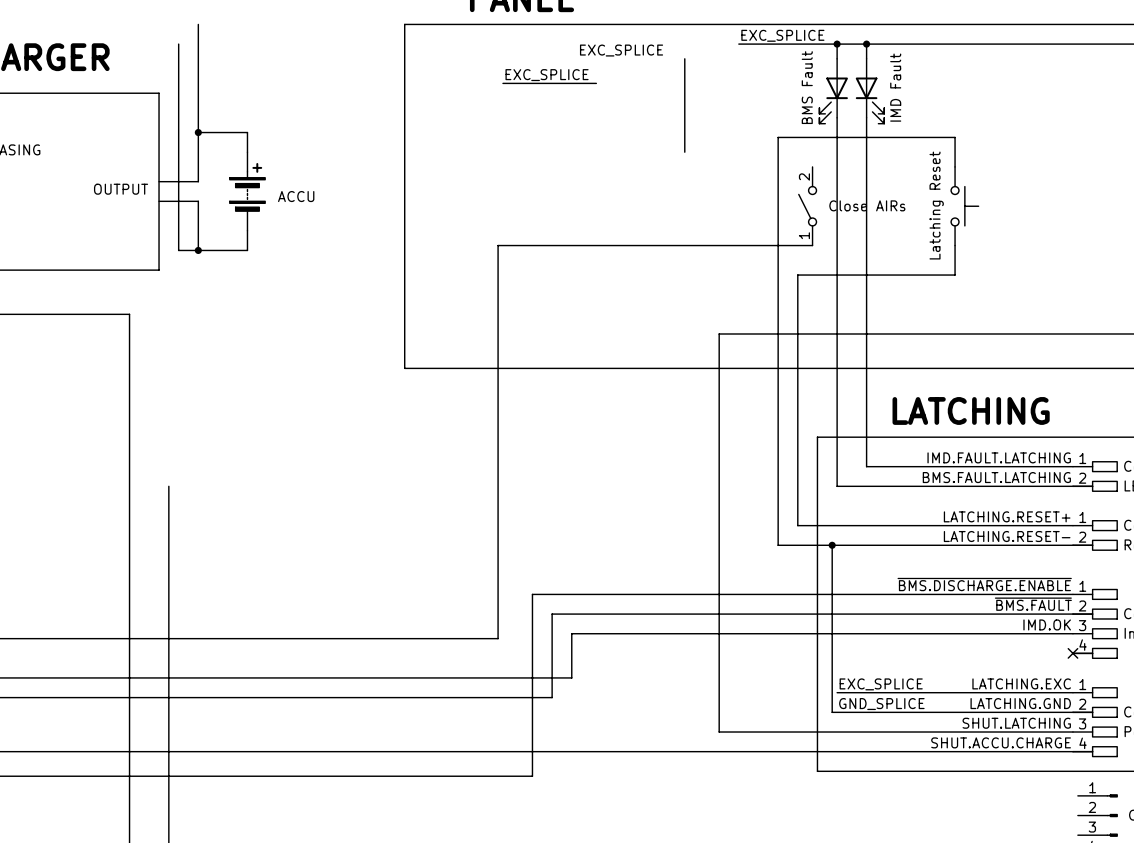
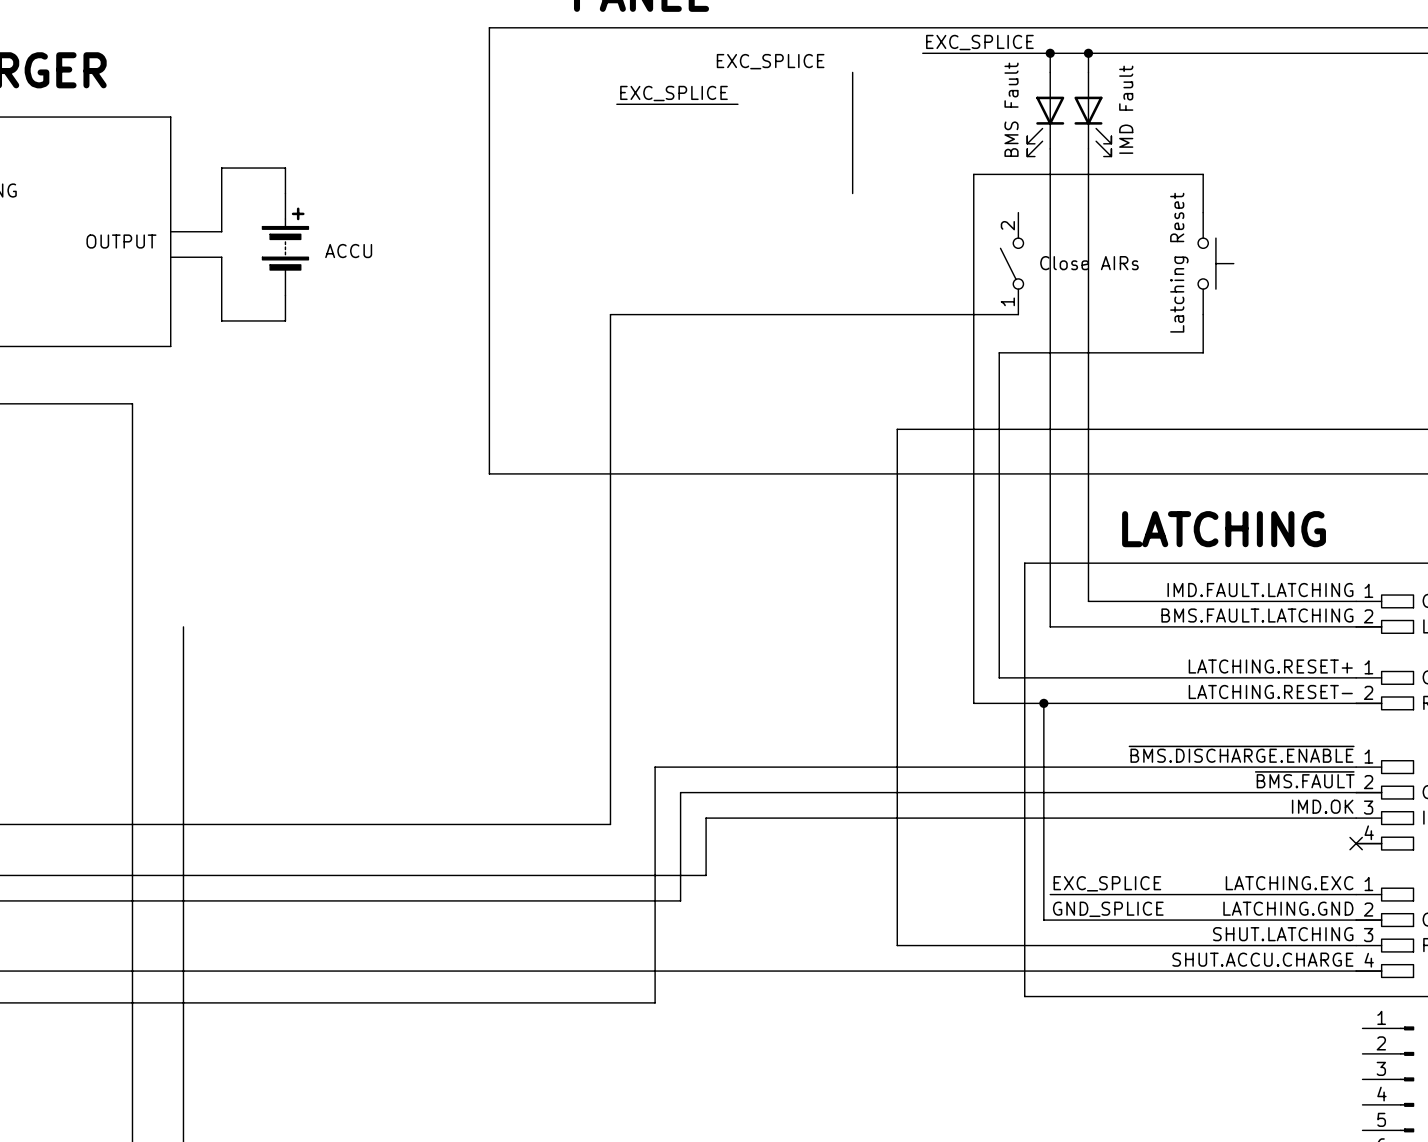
wire: (198, 24) (198, 132) -> none
wire: (178, 44) (178, 250) (198, 250) -> none
junction: (198, 132) -> none
junction: (198, 250) -> none

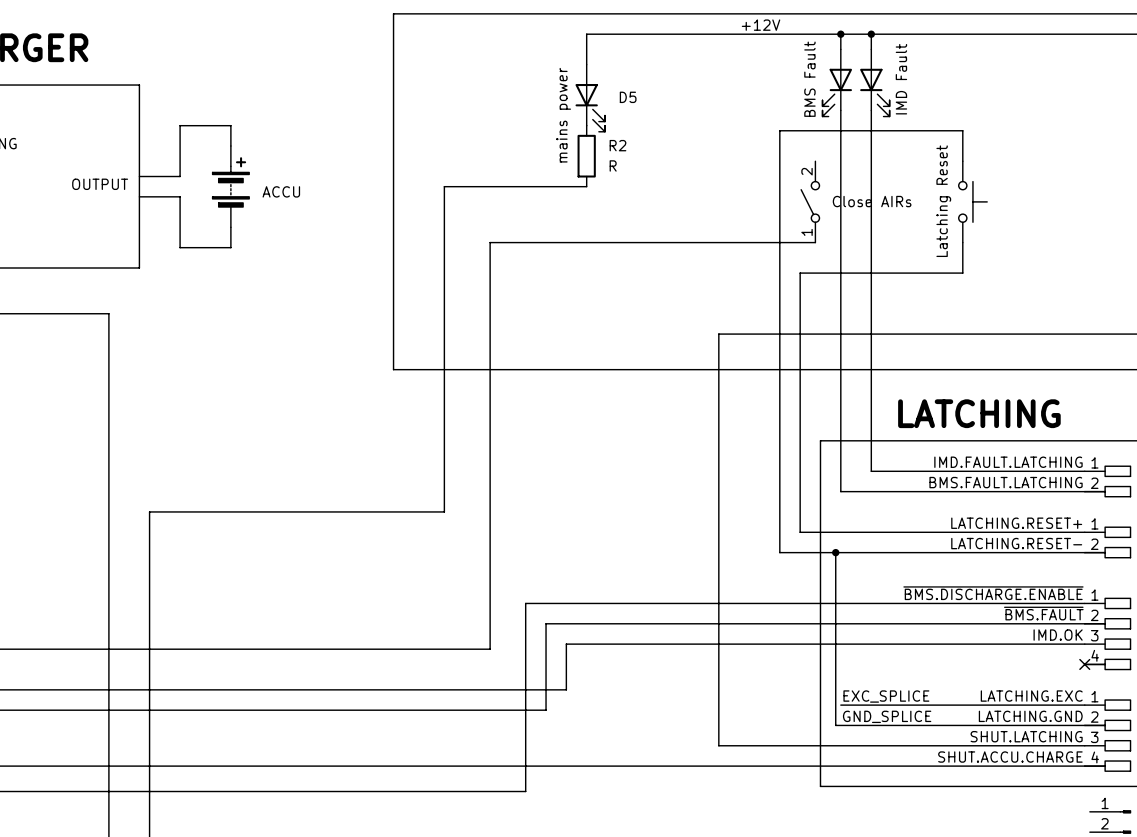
label: EXC_SPLICE (979, 42) -> +12V (761, 25)
wire: none -> (739, 34) (586, 34) (586, 64)
label: EXC_SPLICE (770, 61) -> none
wire: (852, 72) (852, 193) -> none
label: EXC_SPLICE (674, 93) -> none
wire: (616, 104) (737, 104) -> none
D5: none -> mains power (590, 98)
R2: none -> R (586, 156)
wire: (183, 626) (183, 652) -> (586, 186) (444, 186) (444, 511) (149, 511)

